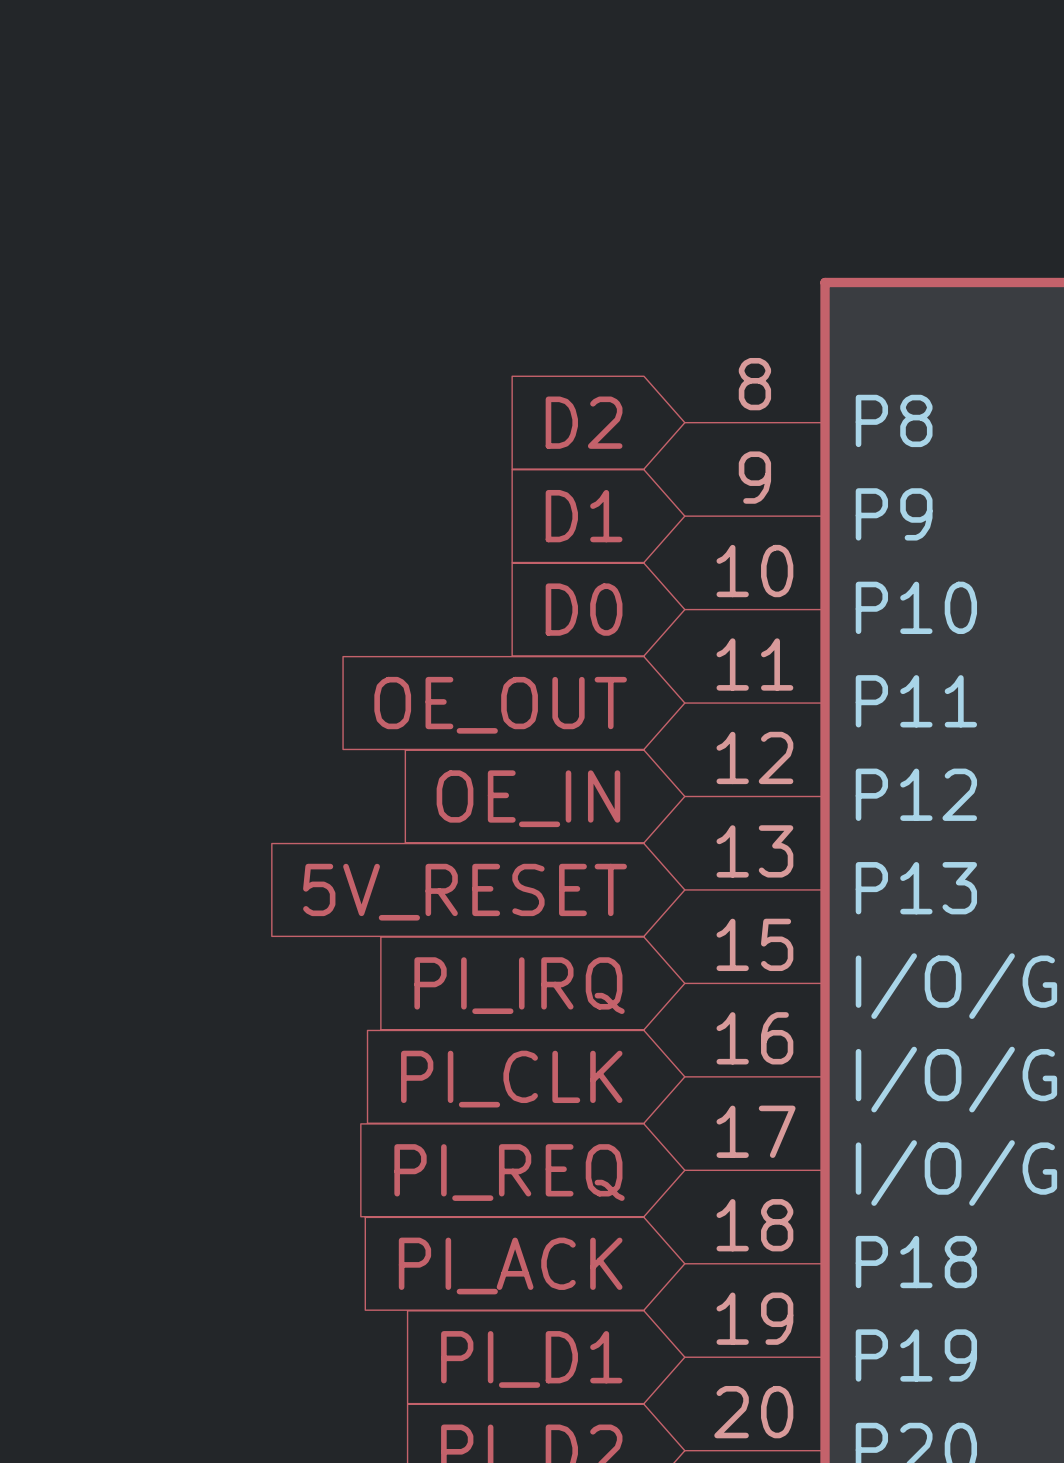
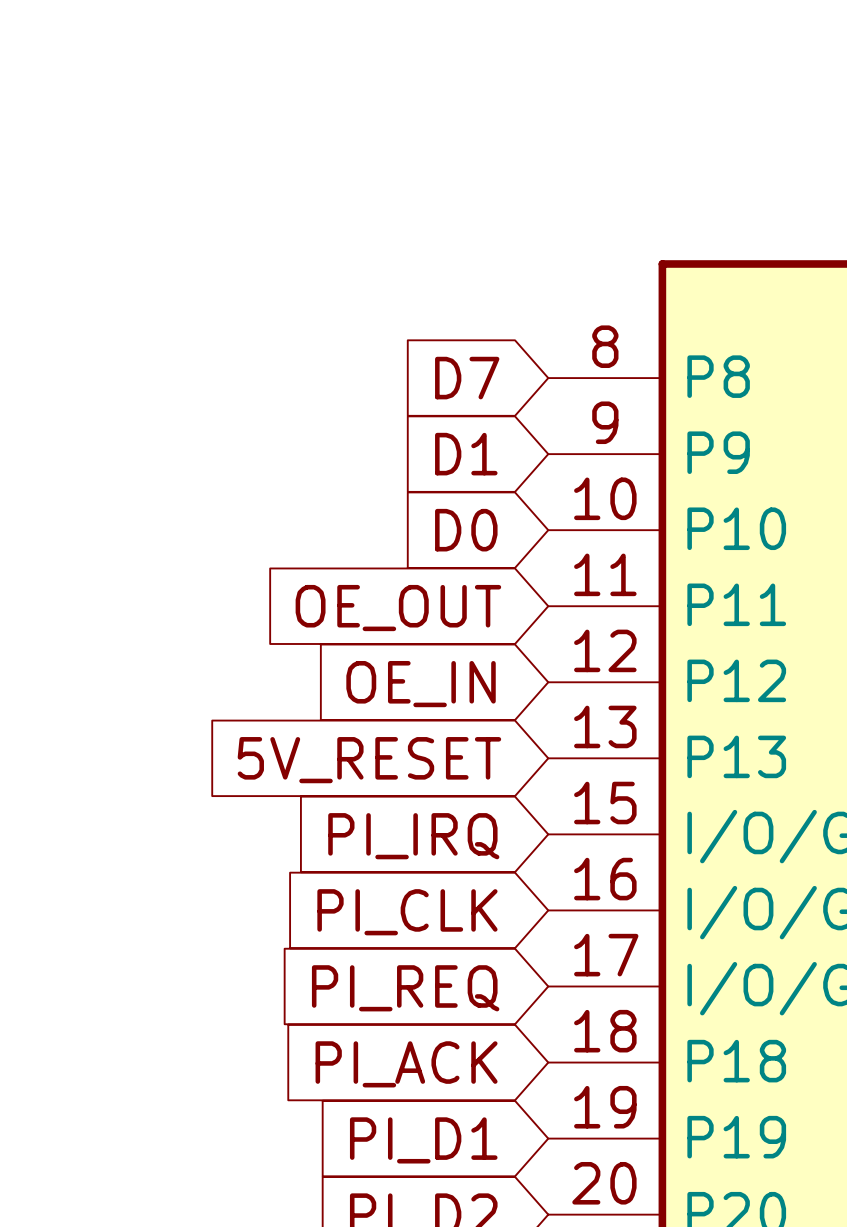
global label: D2 (584, 422) -> D7 (467, 378)

